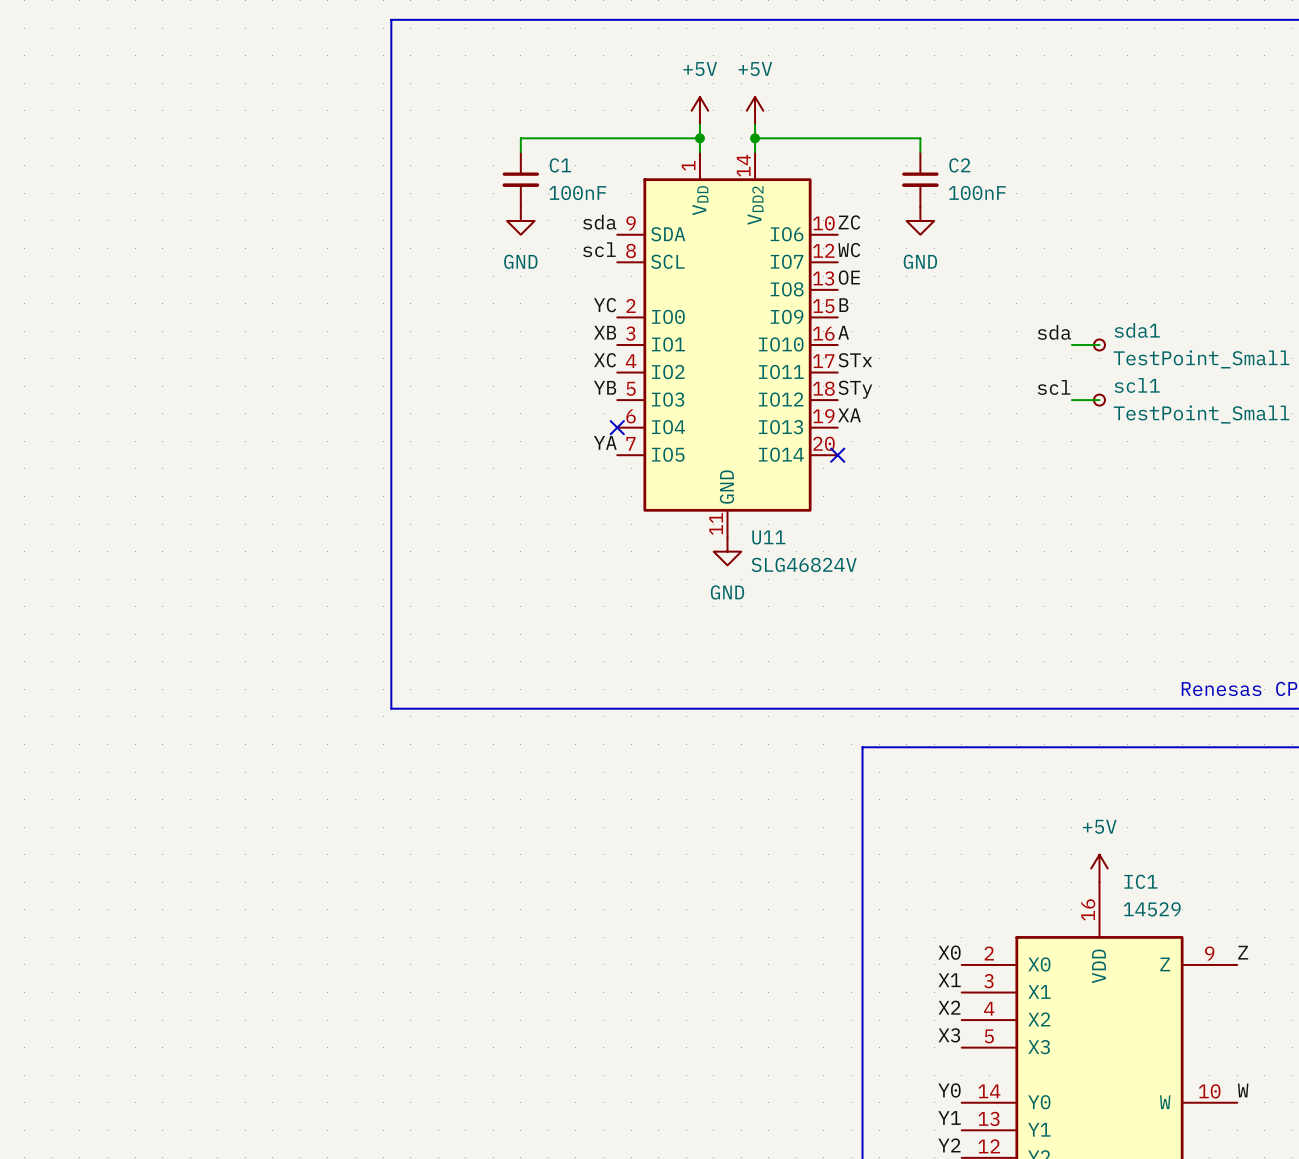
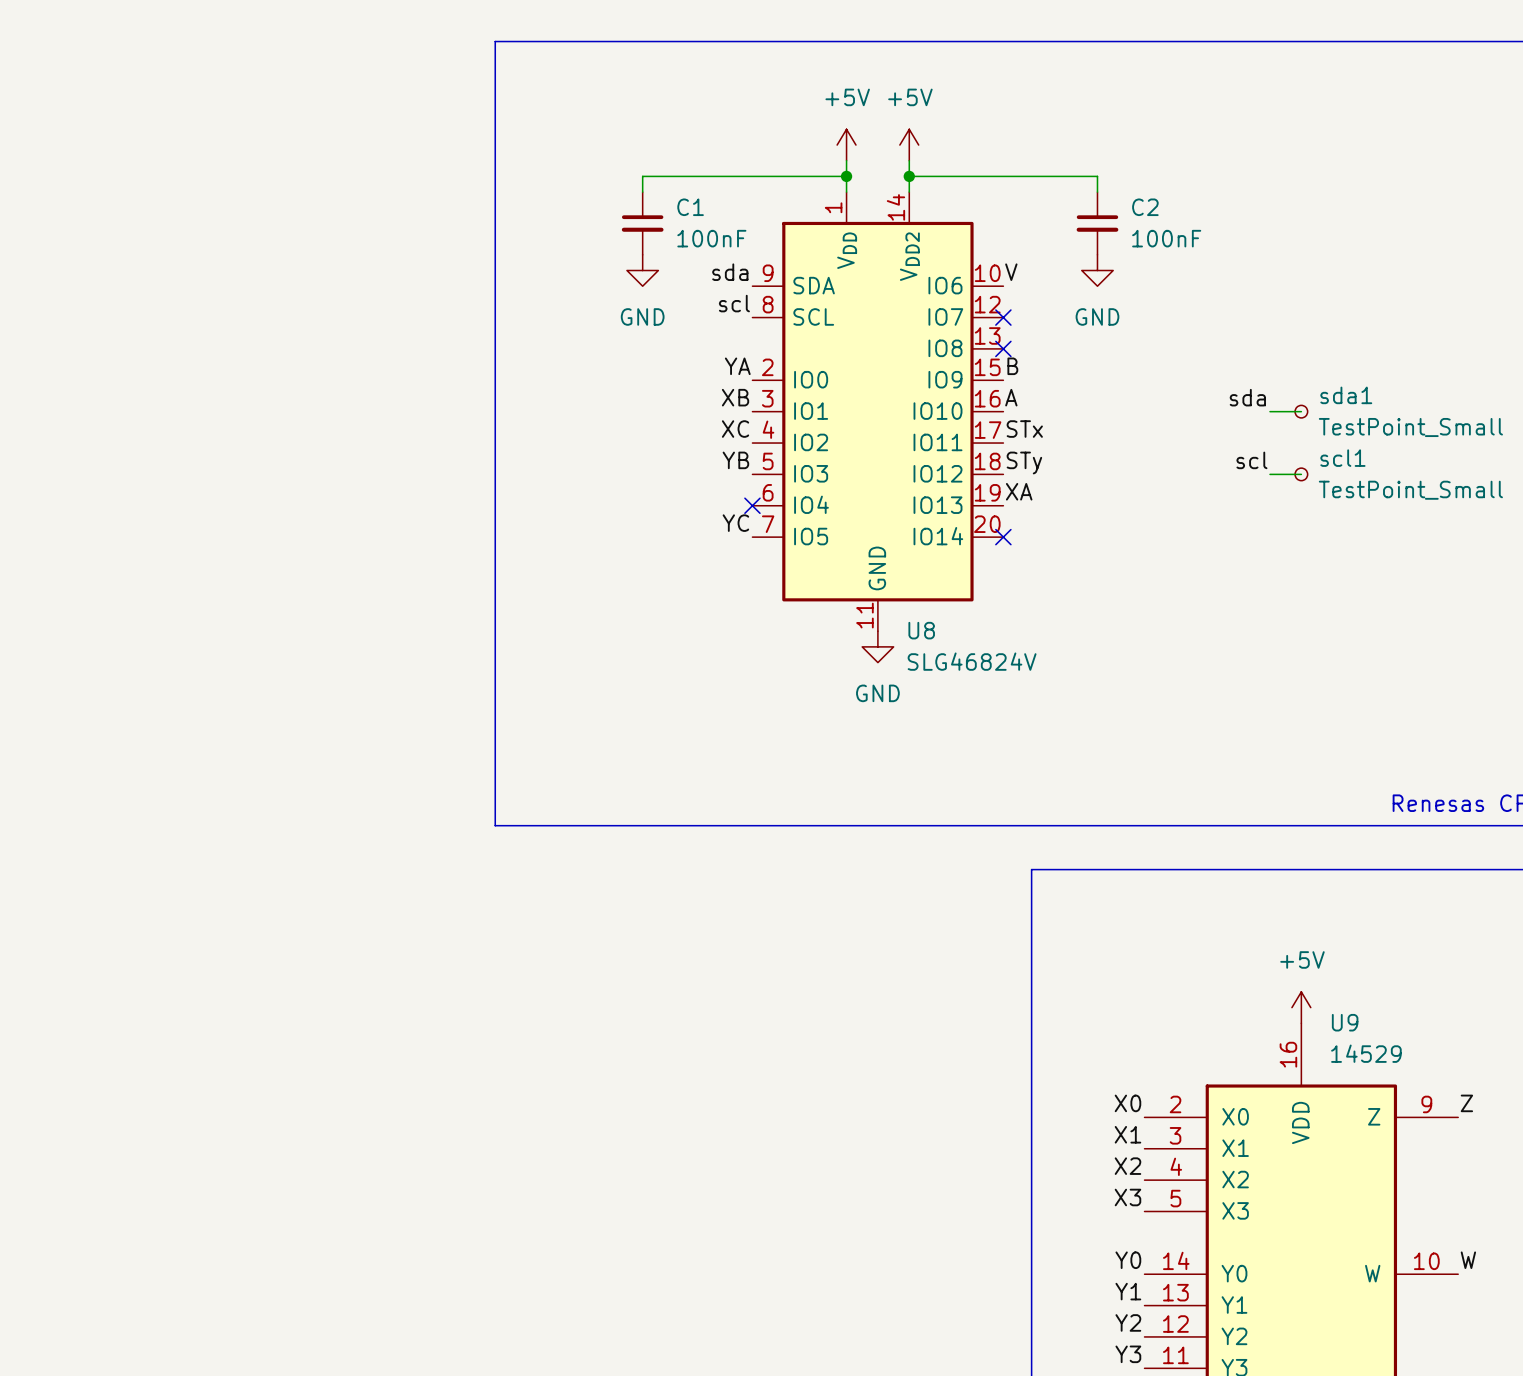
label: ZC (849, 222) -> V (1011, 272)
label: WC (849, 250) -> none
no-connect mark: none -> (1003, 317)
label: OE (849, 277) -> none
no-connect mark: none -> (1003, 348)
label: YC (604, 305) -> YA (737, 366)
label: YA (605, 442) -> YC (735, 523)
U11 name: U11 (768, 537) -> U8 (921, 630)
IC1 name: IC1 (1140, 881) -> U9 (1345, 1022)

